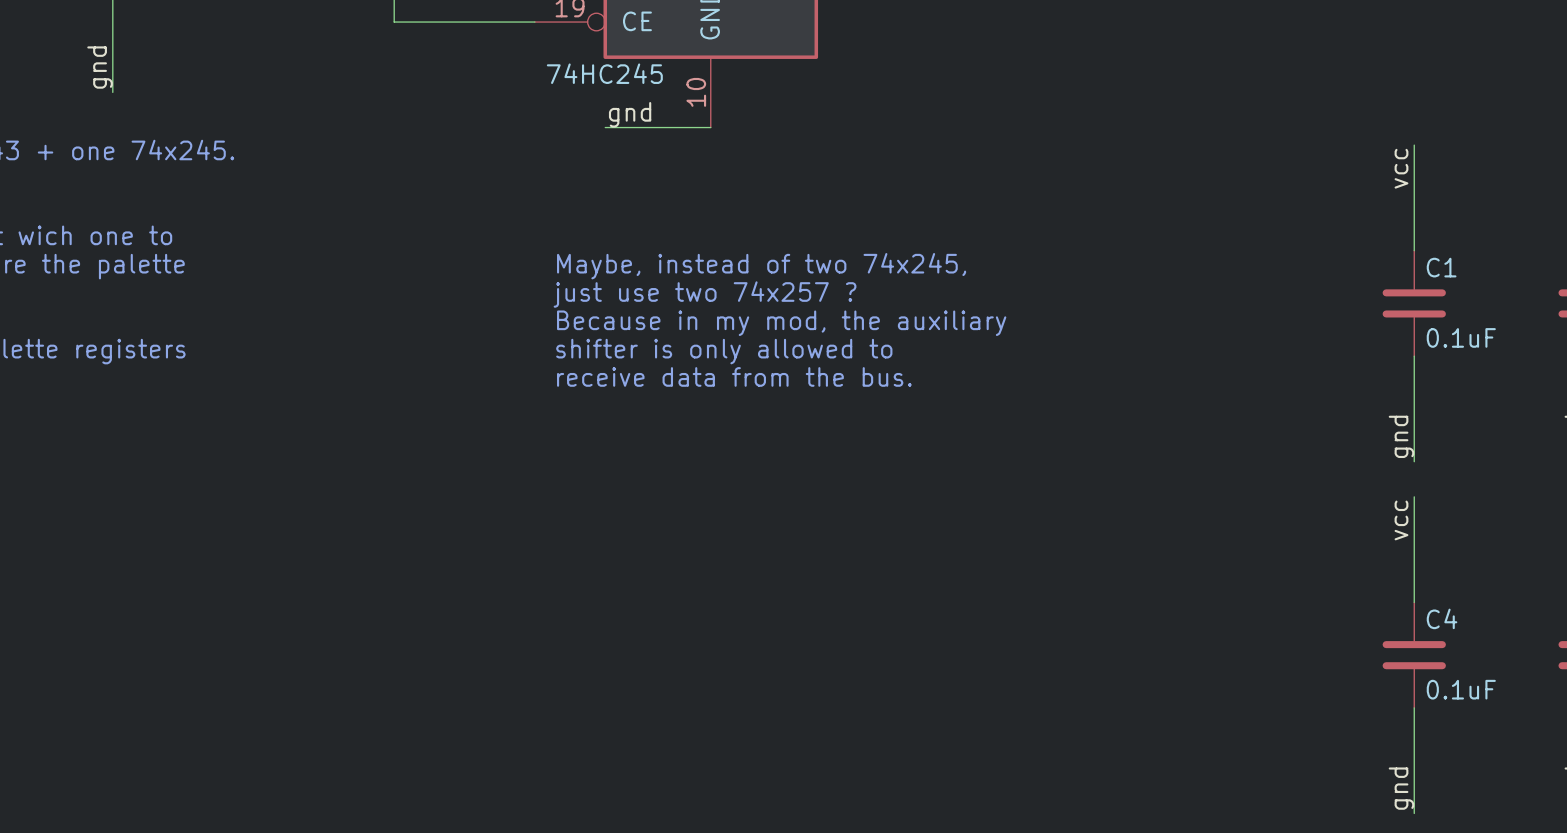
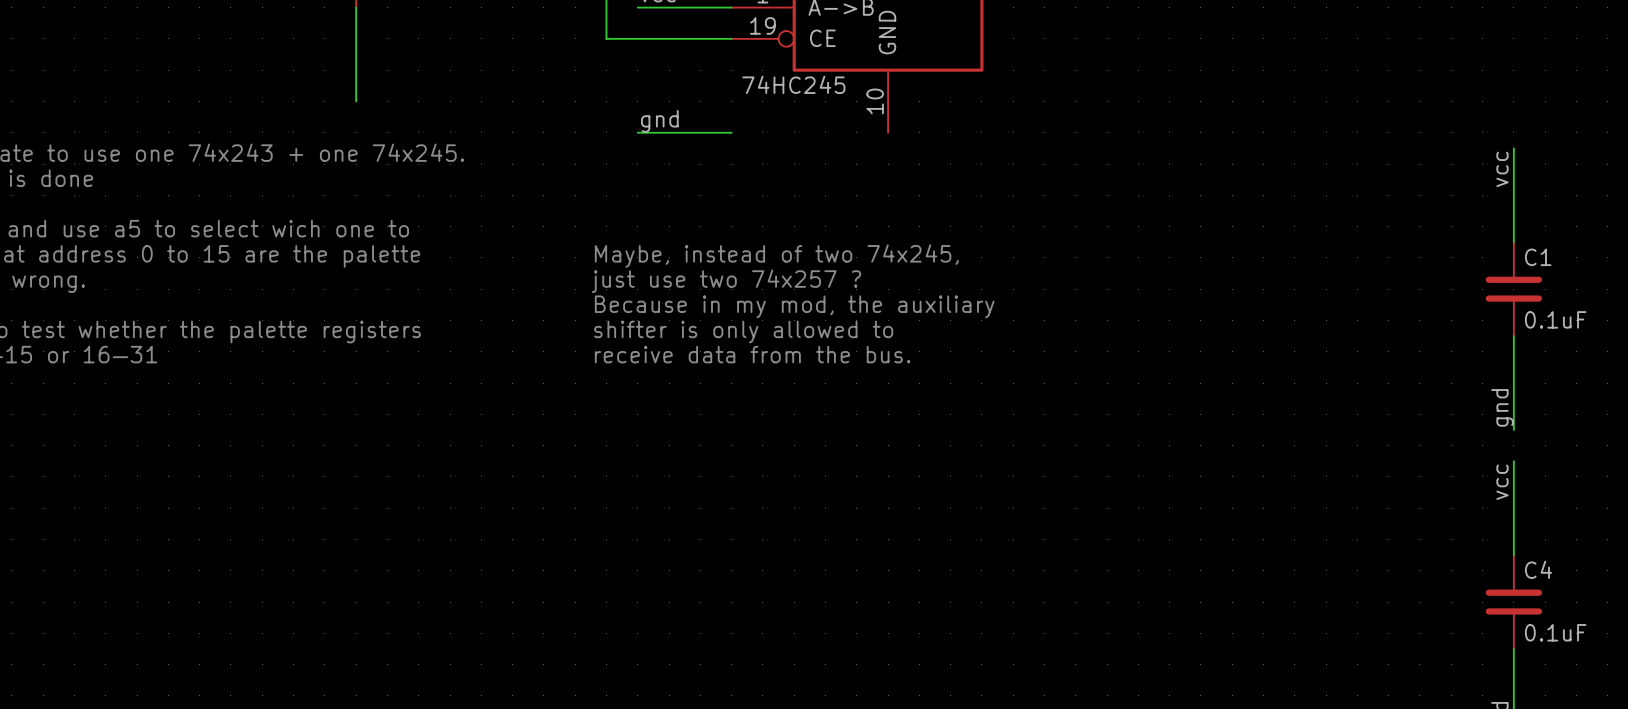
label: gnd (100, 67) -> none
label: none -> gnd (659, 121)
label: gnd (630, 114) -> none
wire: (605, 127) (710, 127) -> (637, 132) (731, 132)
text position: Maybe, instead of two 74x245, (761, 266) -> Maybe, instead of two 74x245, (776, 256)
text position: just use two 74x257 ? (705, 294) -> just use two 74x257 ? (726, 281)
text position: Because in my mod, the auxiliary (781, 323) -> Because in my mod, the auxiliary (794, 306)
text position: shifter is only allowed to (724, 351) -> shifter is only allowed to (743, 332)
text position: receive data from the bus. (734, 376) -> receive data from the bus. (752, 354)

